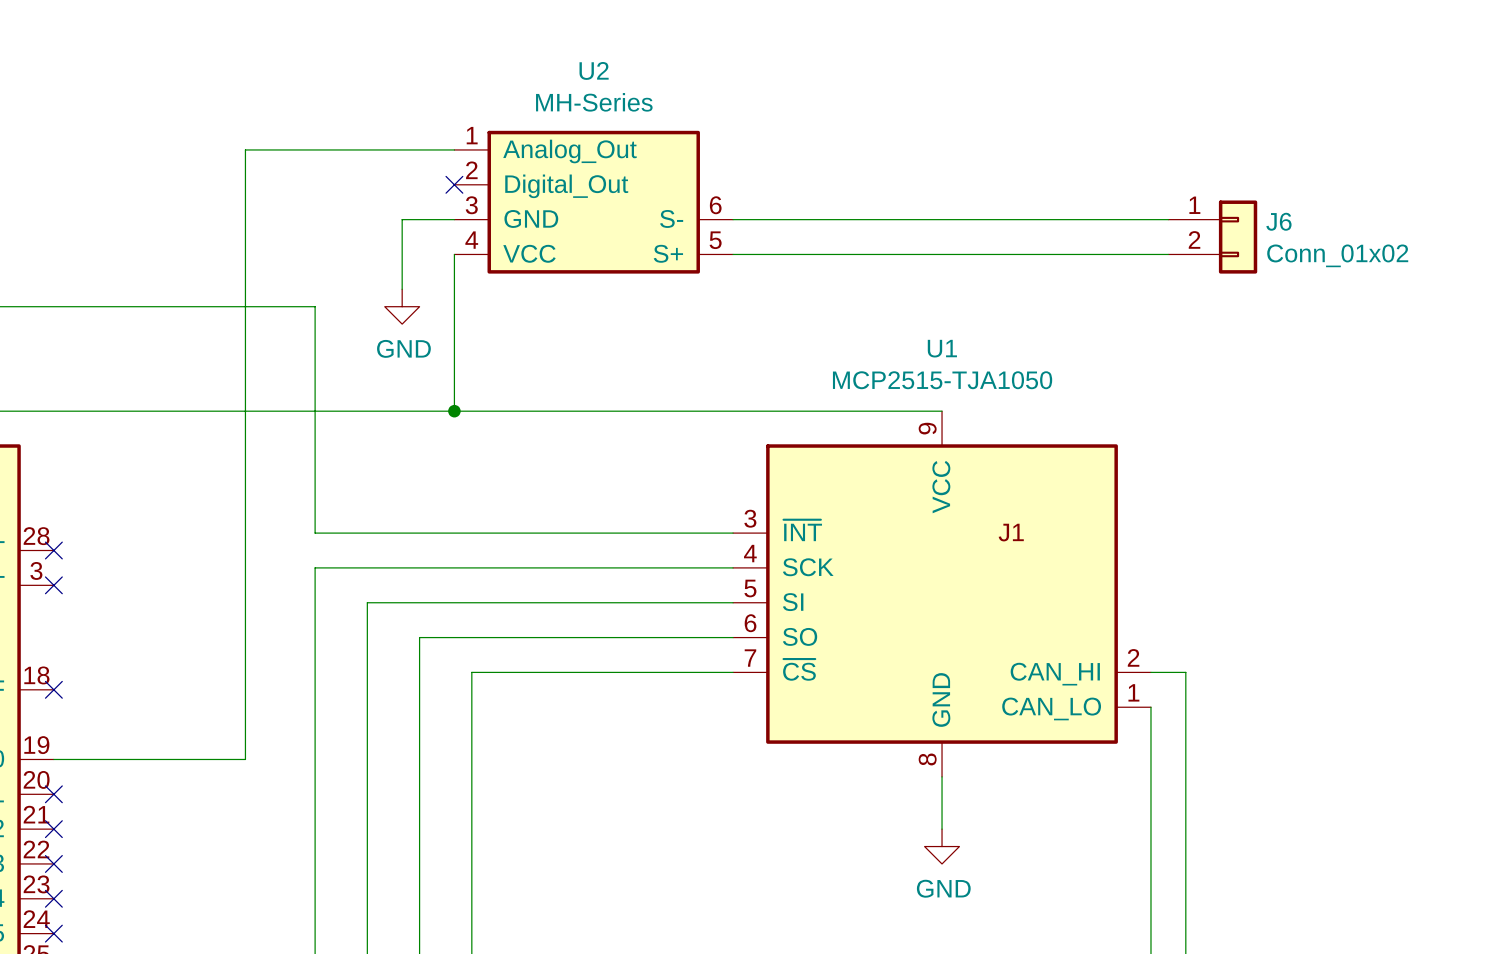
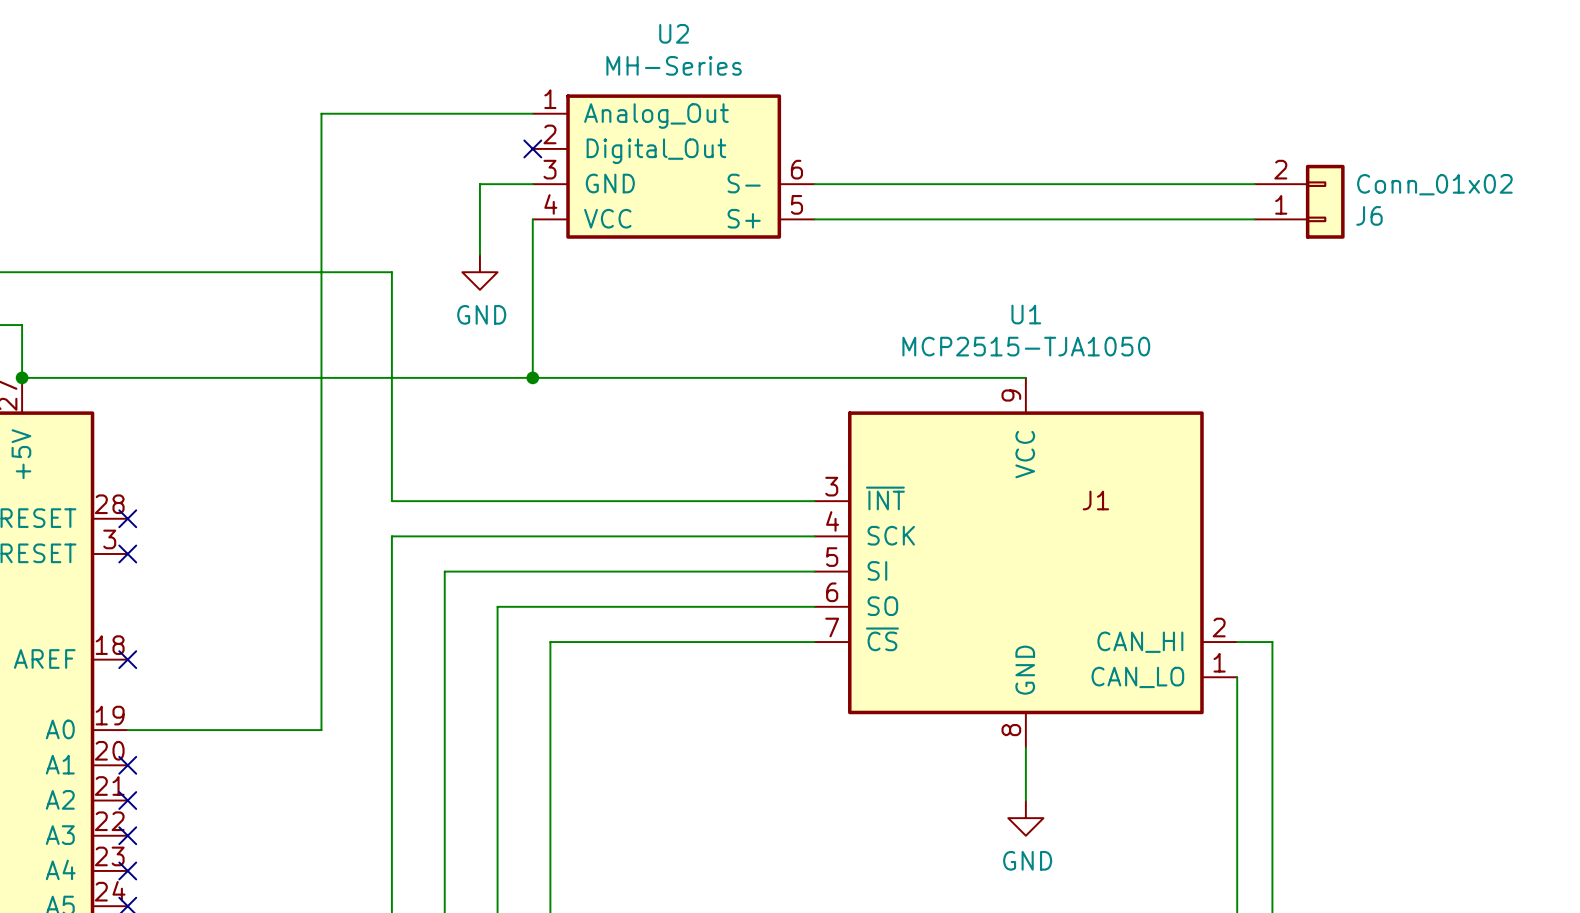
J6 flip: as is (1238, 237) -> up-down (1325, 201)

